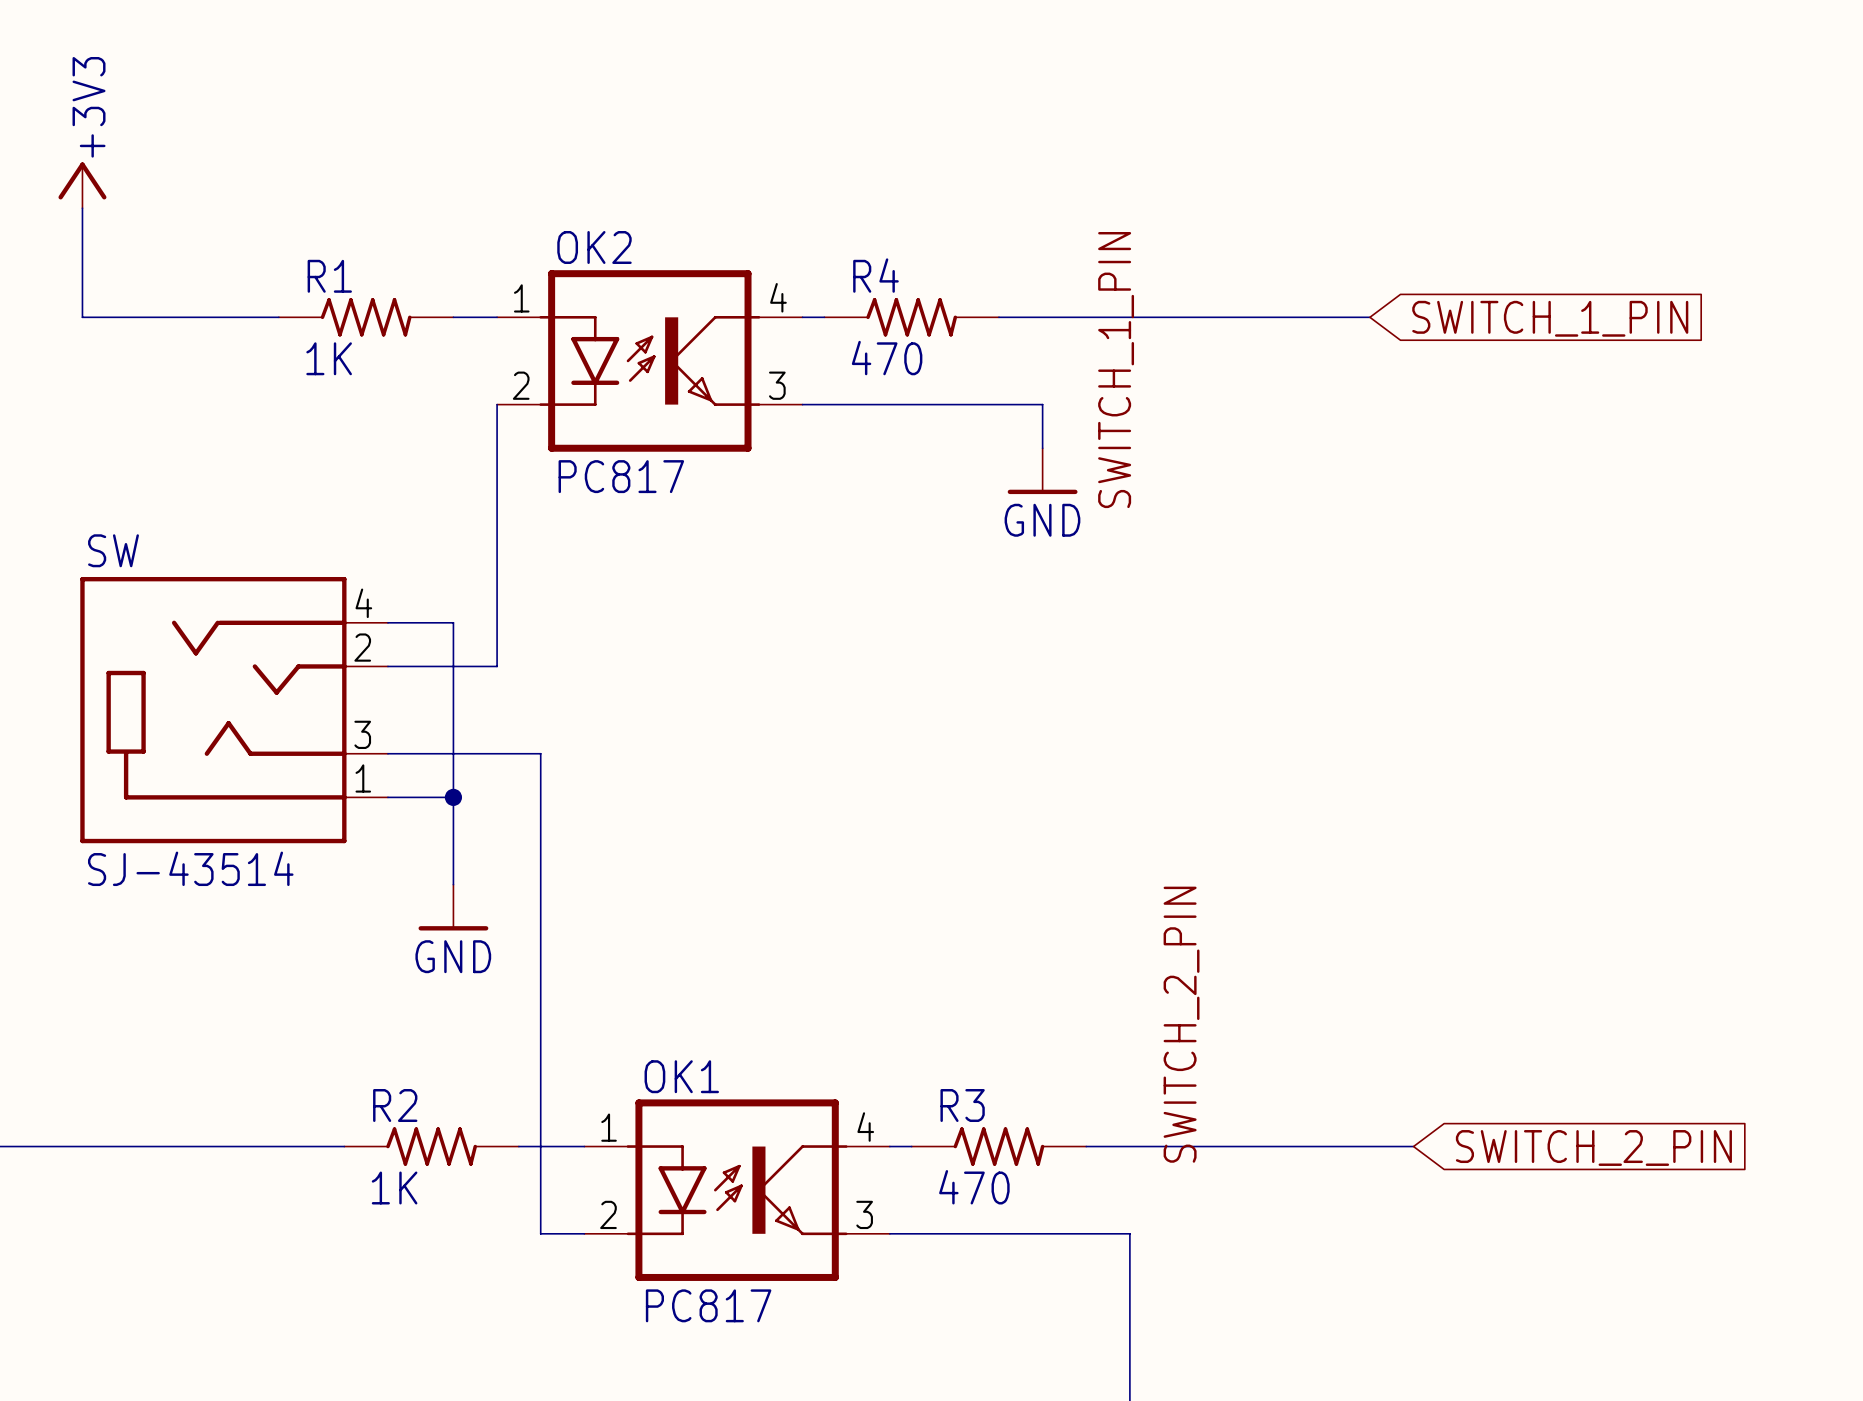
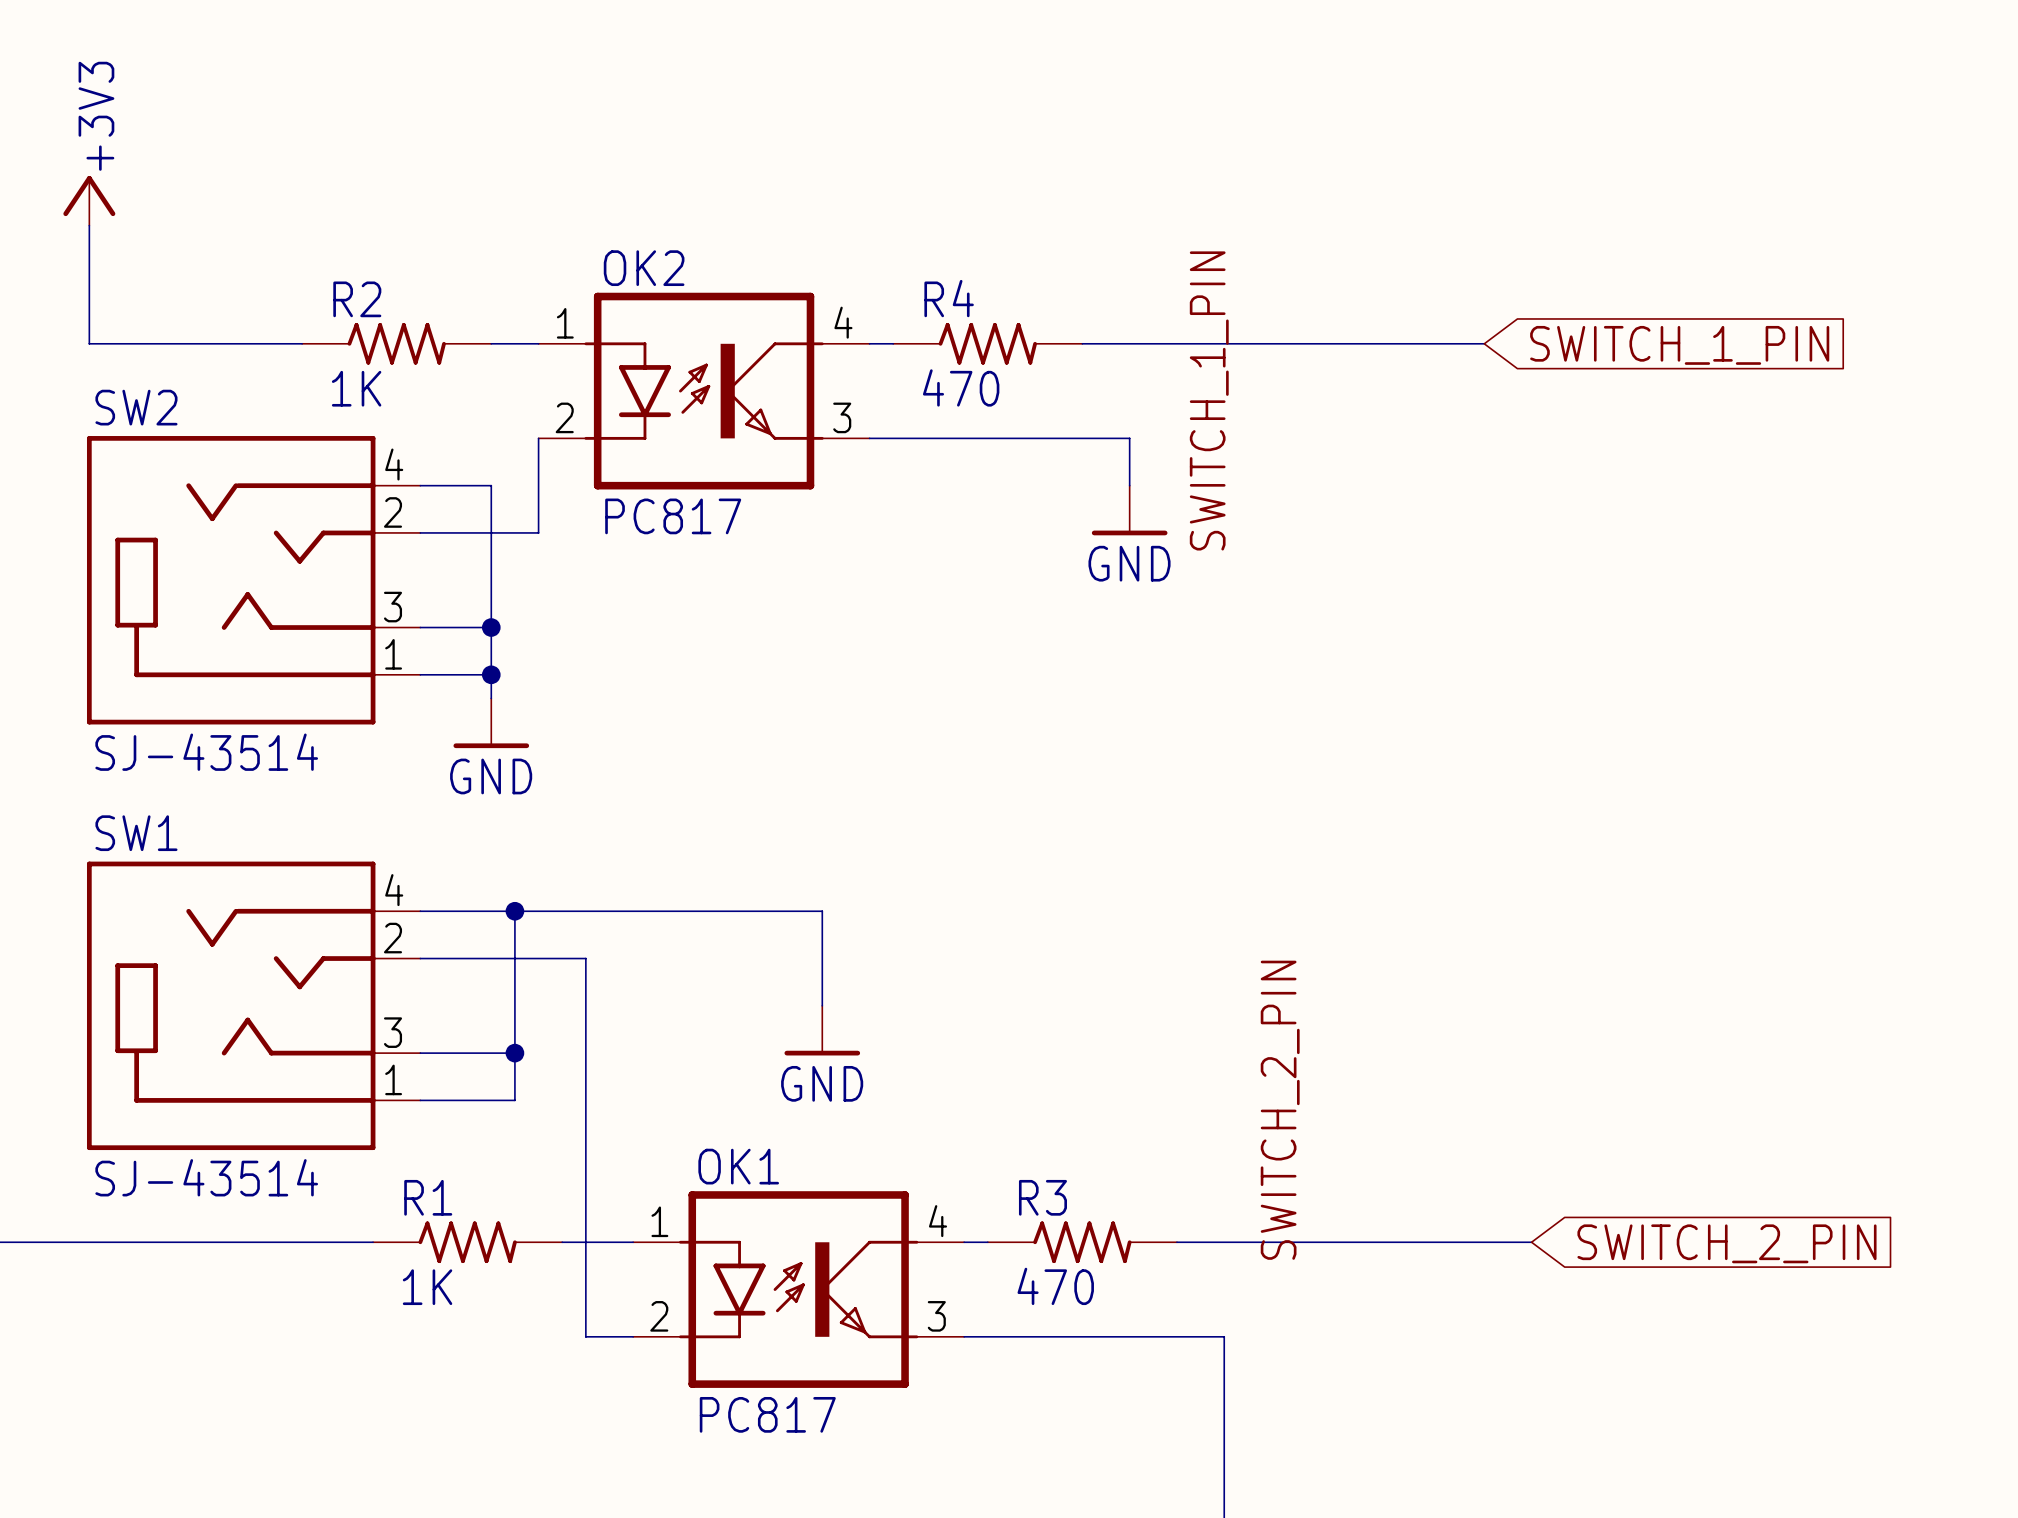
R1 name: R1 (329, 276) -> R2 (357, 299)
wire: none -> (420, 485) (491, 485) (491, 674)
wire: (497, 491) (497, 666) (387, 666) -> (538, 532) (420, 532)
SW2: none -> SJ-43514 (253, 580)
junction: none -> (491, 627)
junction: none -> (491, 674)
wire: (453, 644) (453, 884) -> none
power symbol: none -> GND (491, 723)
SW: SJ-43514 (234, 710) -> none
wire: (387, 753) (540, 753) (540, 884) -> (420, 958) (585, 958)
wire: (387, 797) (453, 797) -> (420, 627) (491, 627)
junction position: (453, 797) -> (514, 911)
wire: none -> (420, 911) (822, 911) (822, 1005)
wire: none -> (514, 911) (514, 1100) (420, 1100)
power symbol: GND (453, 907) -> none
SW1: none -> SJ-43514 (253, 1005)
power symbol: none -> GND (822, 1030)
wire: none -> (420, 1053) (514, 1053)
junction: none -> (514, 1053)
R2 name: R2 (395, 1105) -> R1 (428, 1197)

